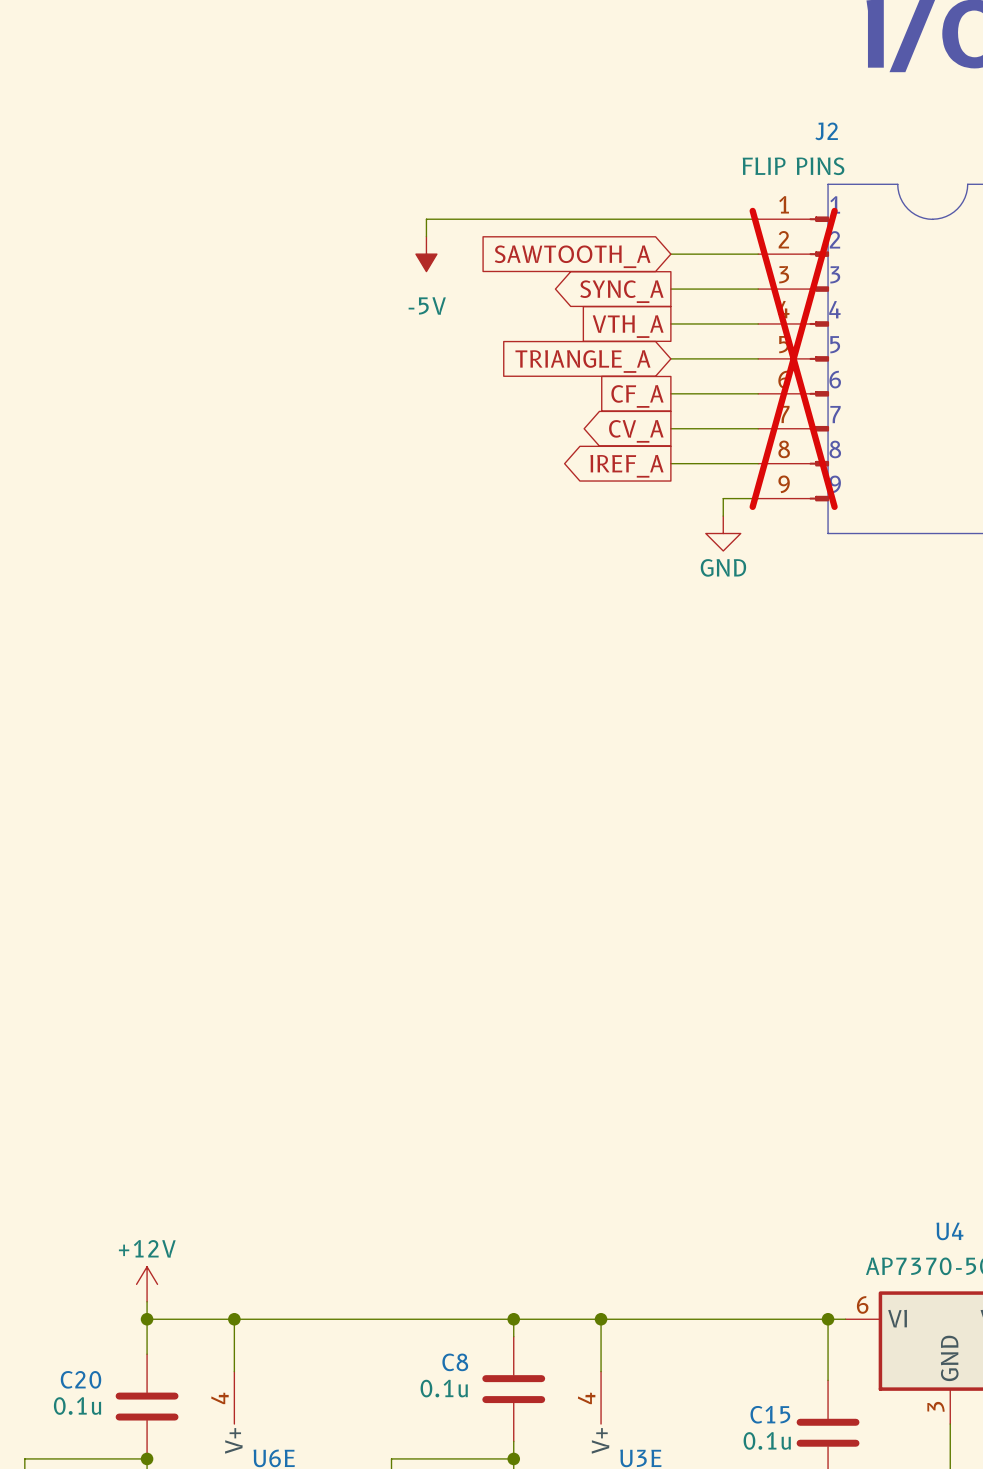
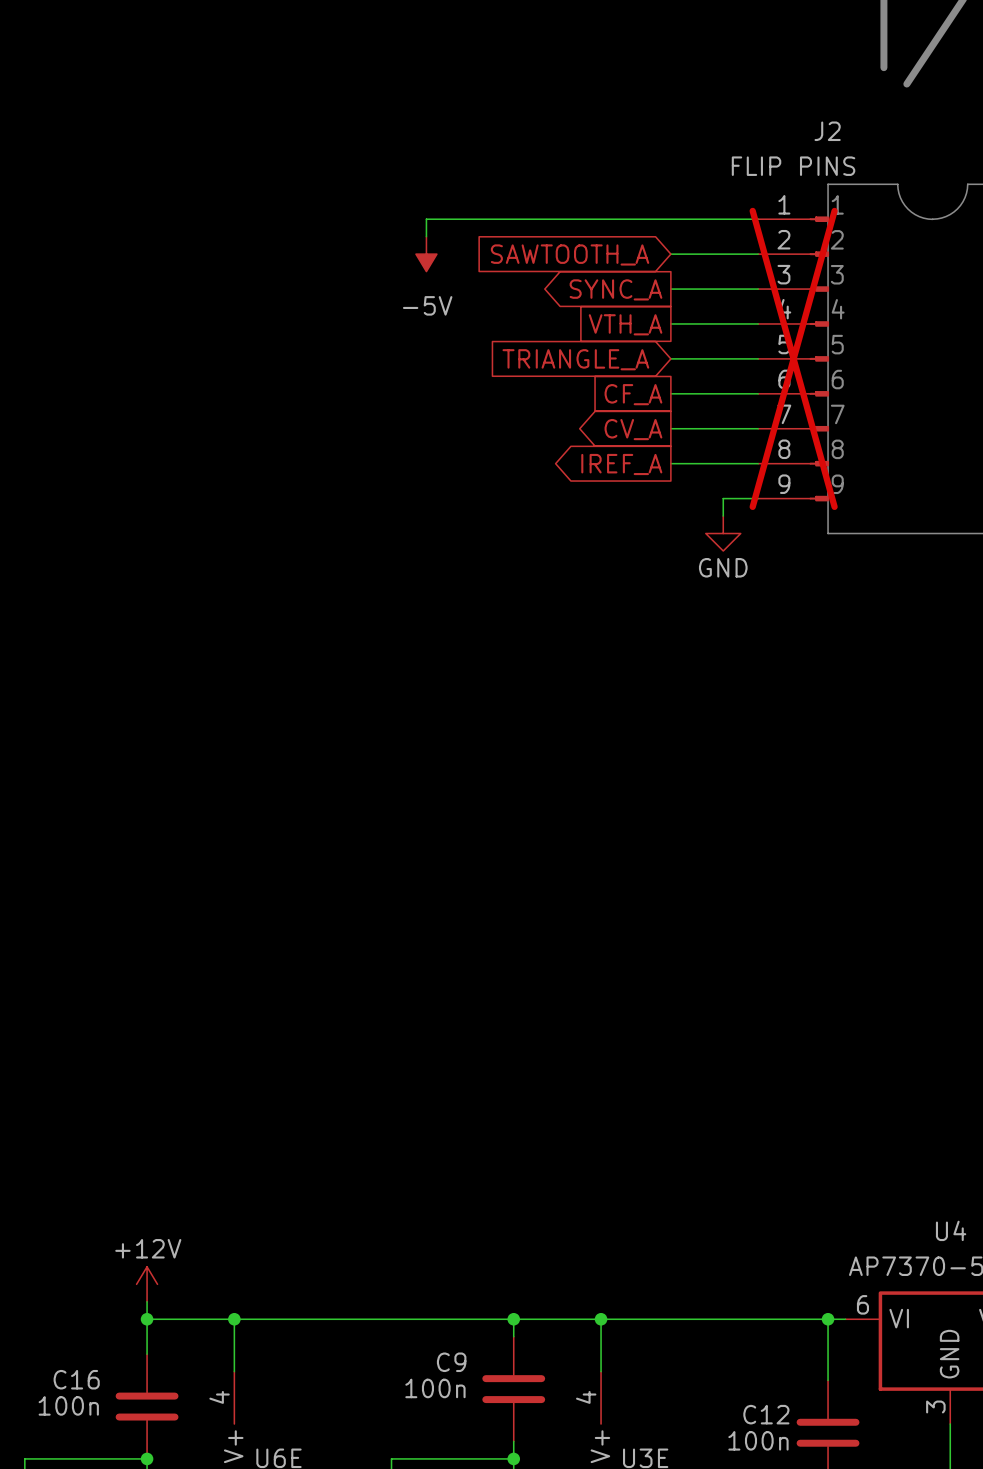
C8 name: C8 (455, 1362) -> C9 (451, 1362)
C20 name: C20 (81, 1379) -> C16 (76, 1379)
C8 value: 0.1u (444, 1388) -> 100n (435, 1388)
C20 value: 0.1u (77, 1406) -> 100n (68, 1405)
C15 name: C15 (770, 1414) -> C12 (766, 1414)
C15 value: 0.1u (767, 1440) -> 100n (758, 1440)

